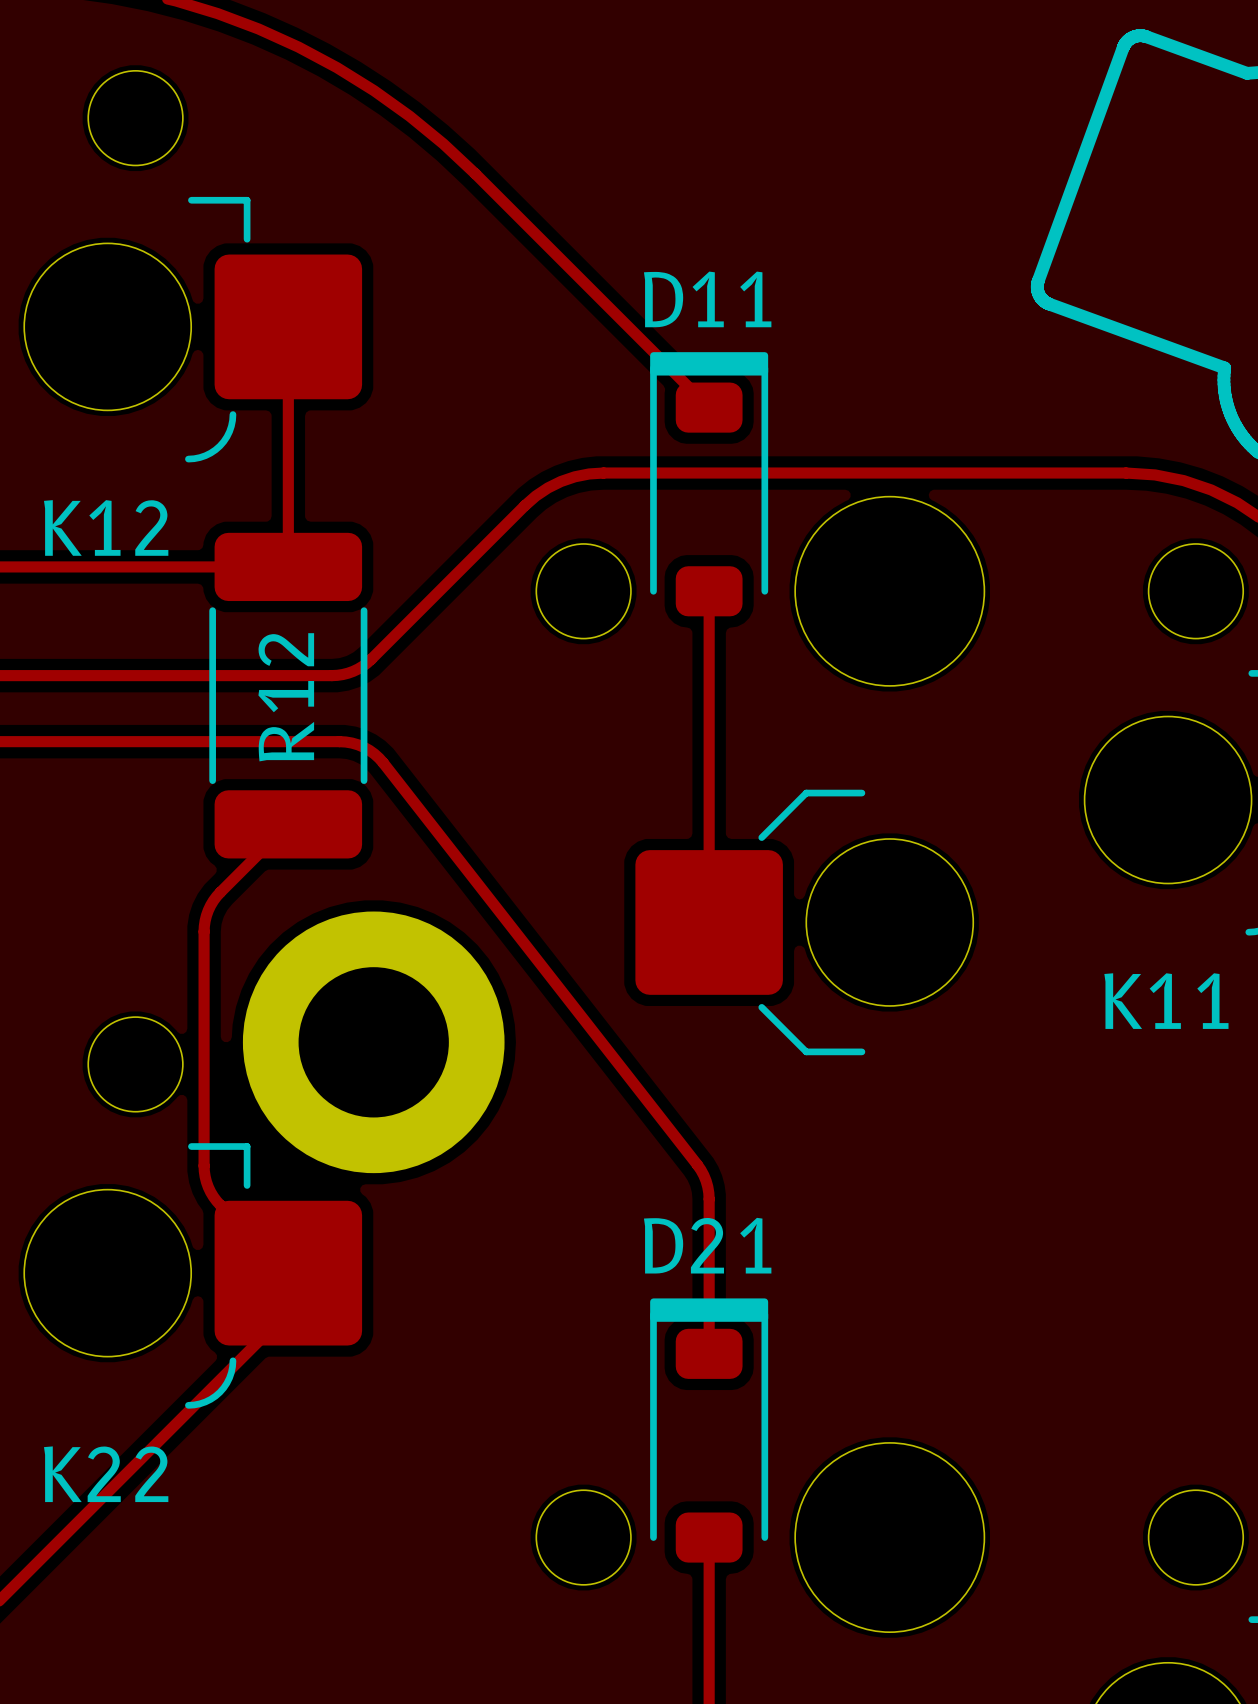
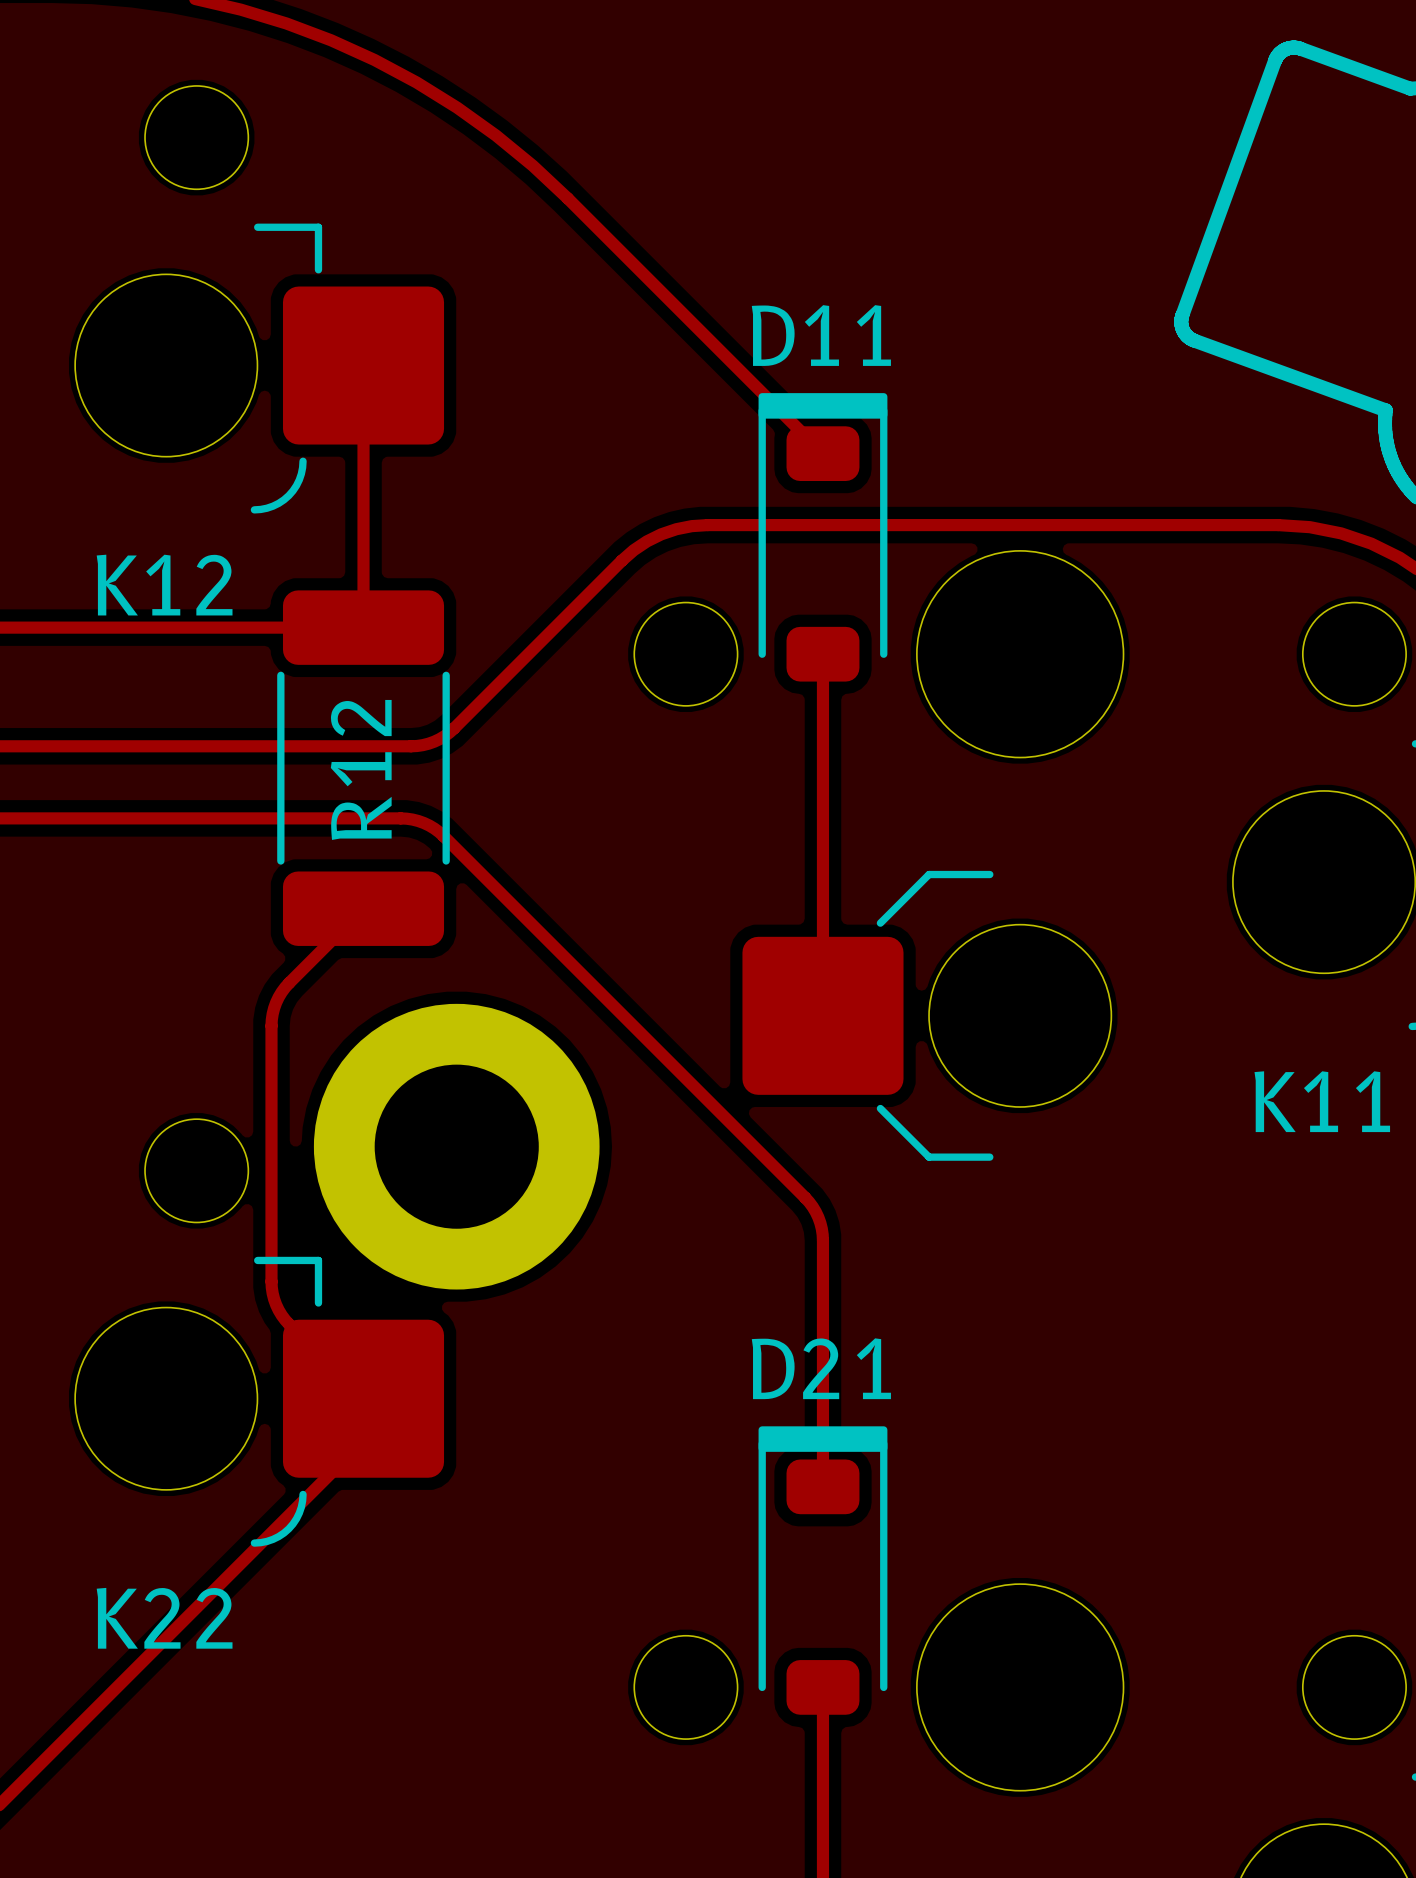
top track: (322, 741) (345, 742) (358, 744) (374, 754) (383, 763) (697, 1164) (706, 1180) (709, 1199) -> (400, 818) (423, 823) (443, 836) (809, 1202) (818, 1217) (822, 1234) (822, 1317)

